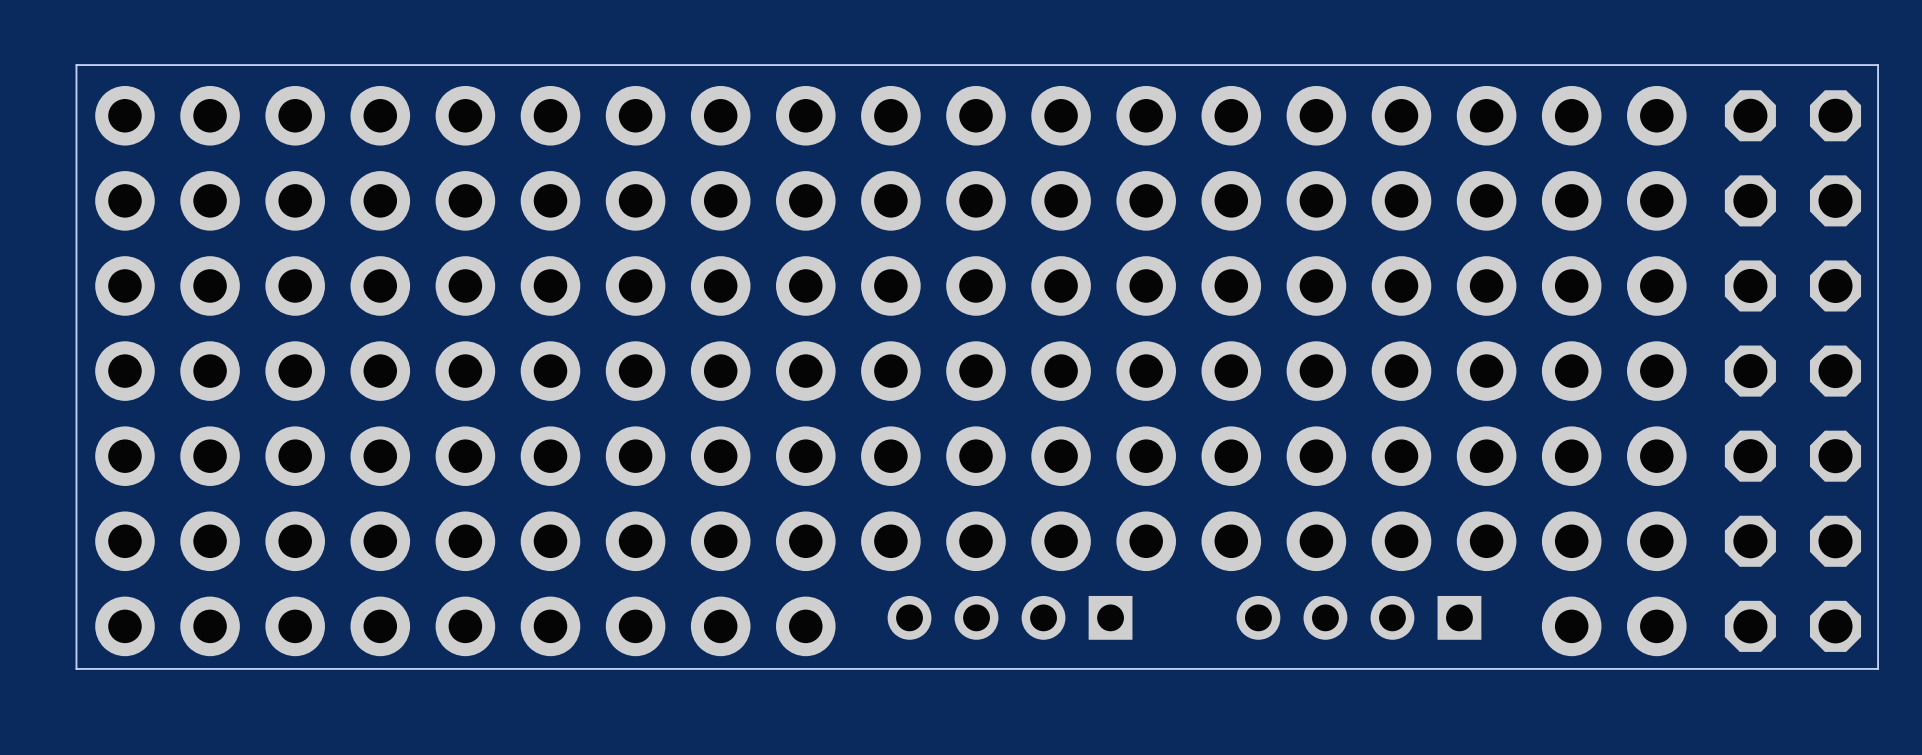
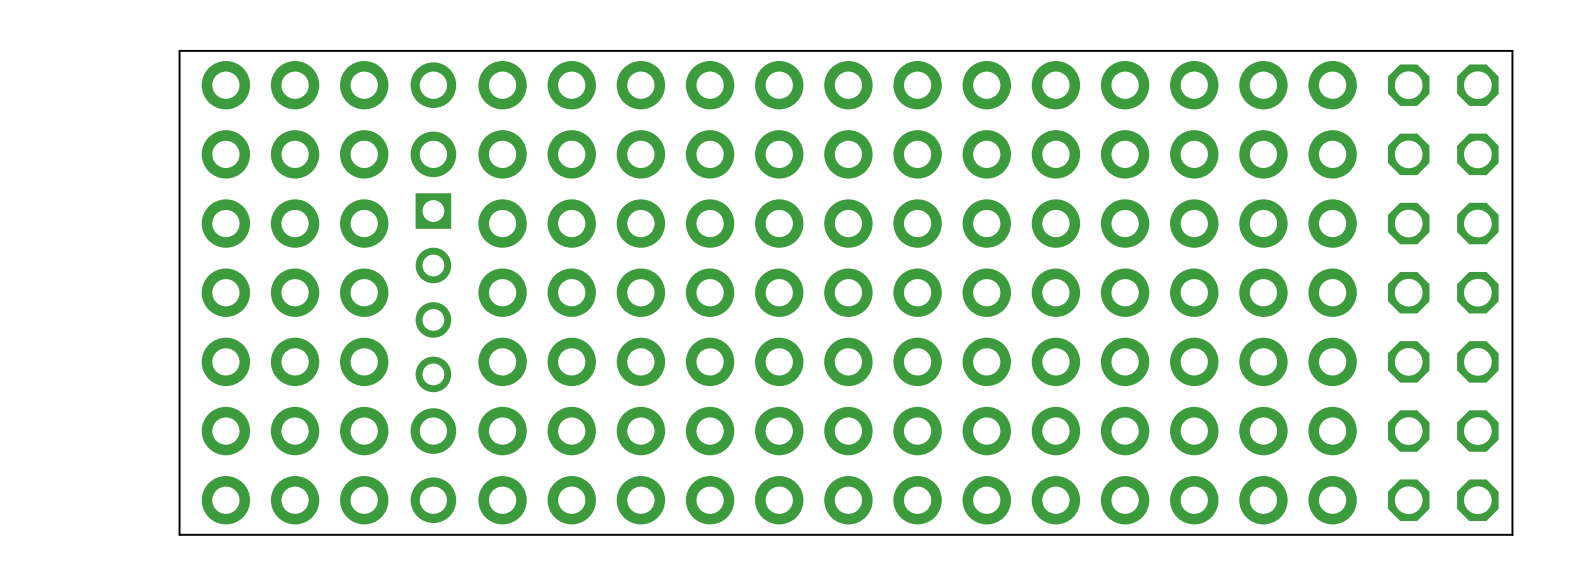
board edge: (1878, 73) (1878, 65) (76, 65) (76, 668) (238, 668) -> (1512, 50) (179, 50) (179, 534)
part footprint: [520, 85, 581, 657] -> [415, 193, 452, 393]
part: none -> (433, 119)
part: (124, 371) -> none
part: (210, 371) -> none
part: none -> (710, 292)
part: none -> (779, 292)
part: none -> (848, 292)
part: none -> (917, 292)
part: none -> (986, 292)
part: none -> (1055, 292)
part: none -> (1125, 292)
part: none -> (1194, 292)
part: none -> (433, 465)
part: (1010, 617) -> none
part: (1358, 617) -> none

